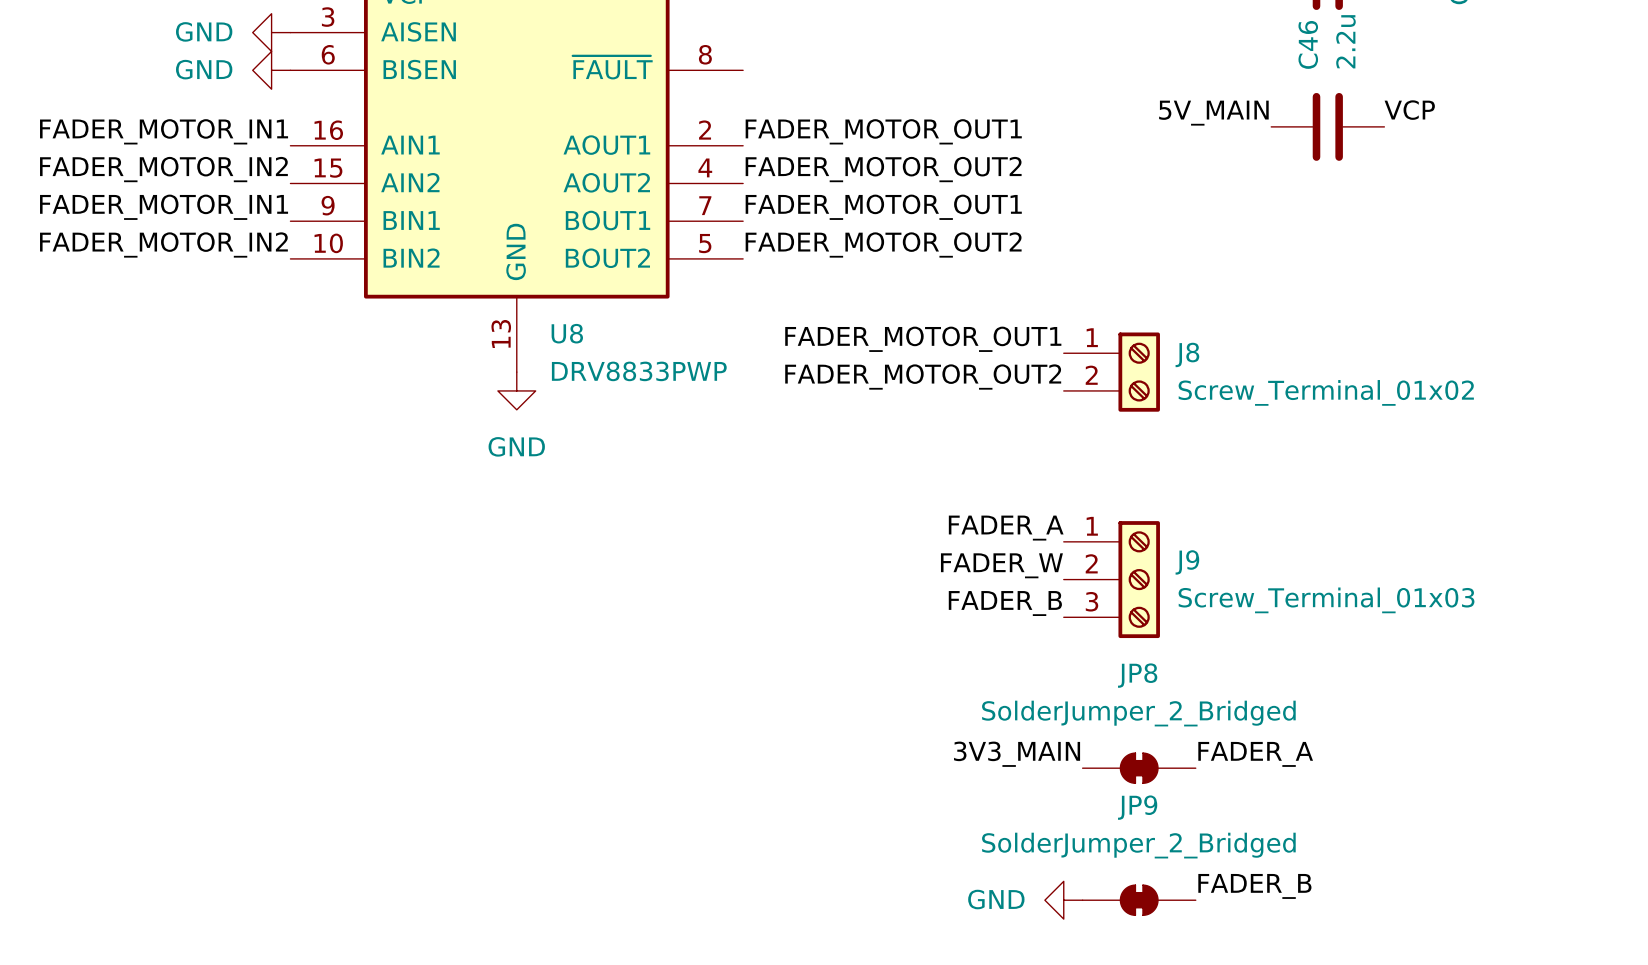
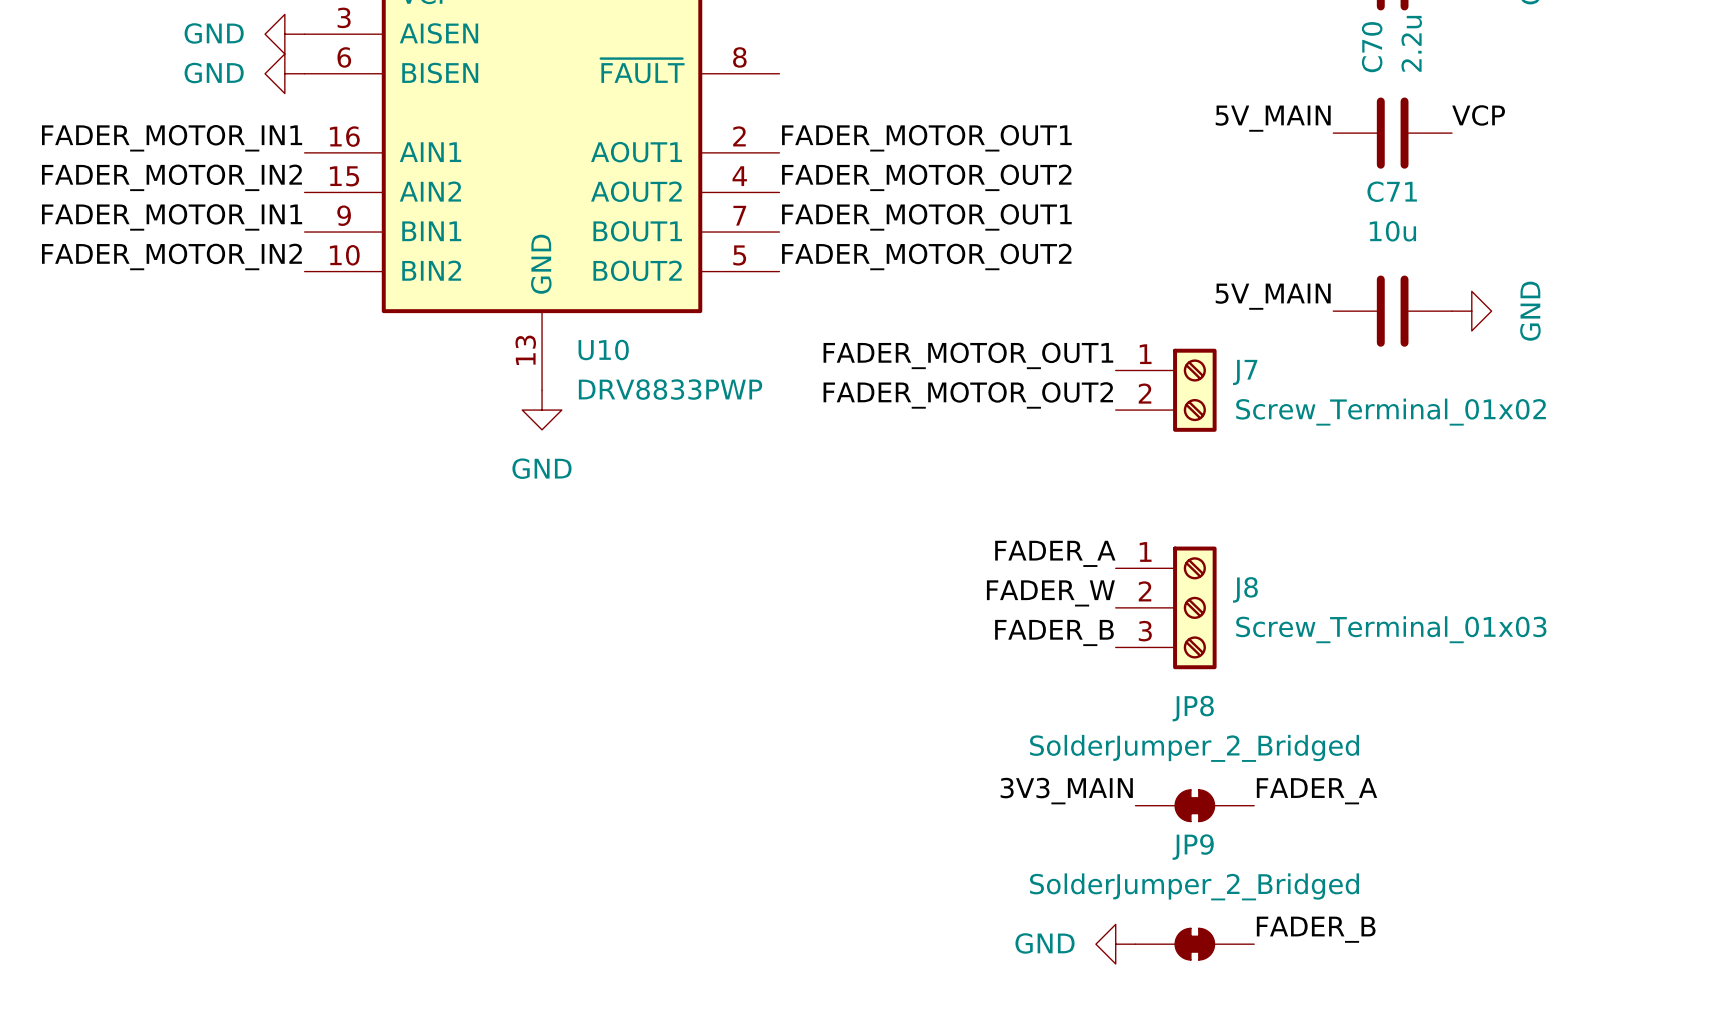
C46 name: C46 (1308, 44) -> C70 (1372, 47)
label: none -> 5V_MAIN (1273, 296)
C71: none -> 10u (1392, 311)
power symbol: none -> GND (1471, 311)
U8 name: U8 (567, 333) -> U10 (603, 349)
J8 name: J8 (1187, 354) -> J7 (1245, 372)
J9 name: J9 (1187, 562) -> J8 (1245, 589)

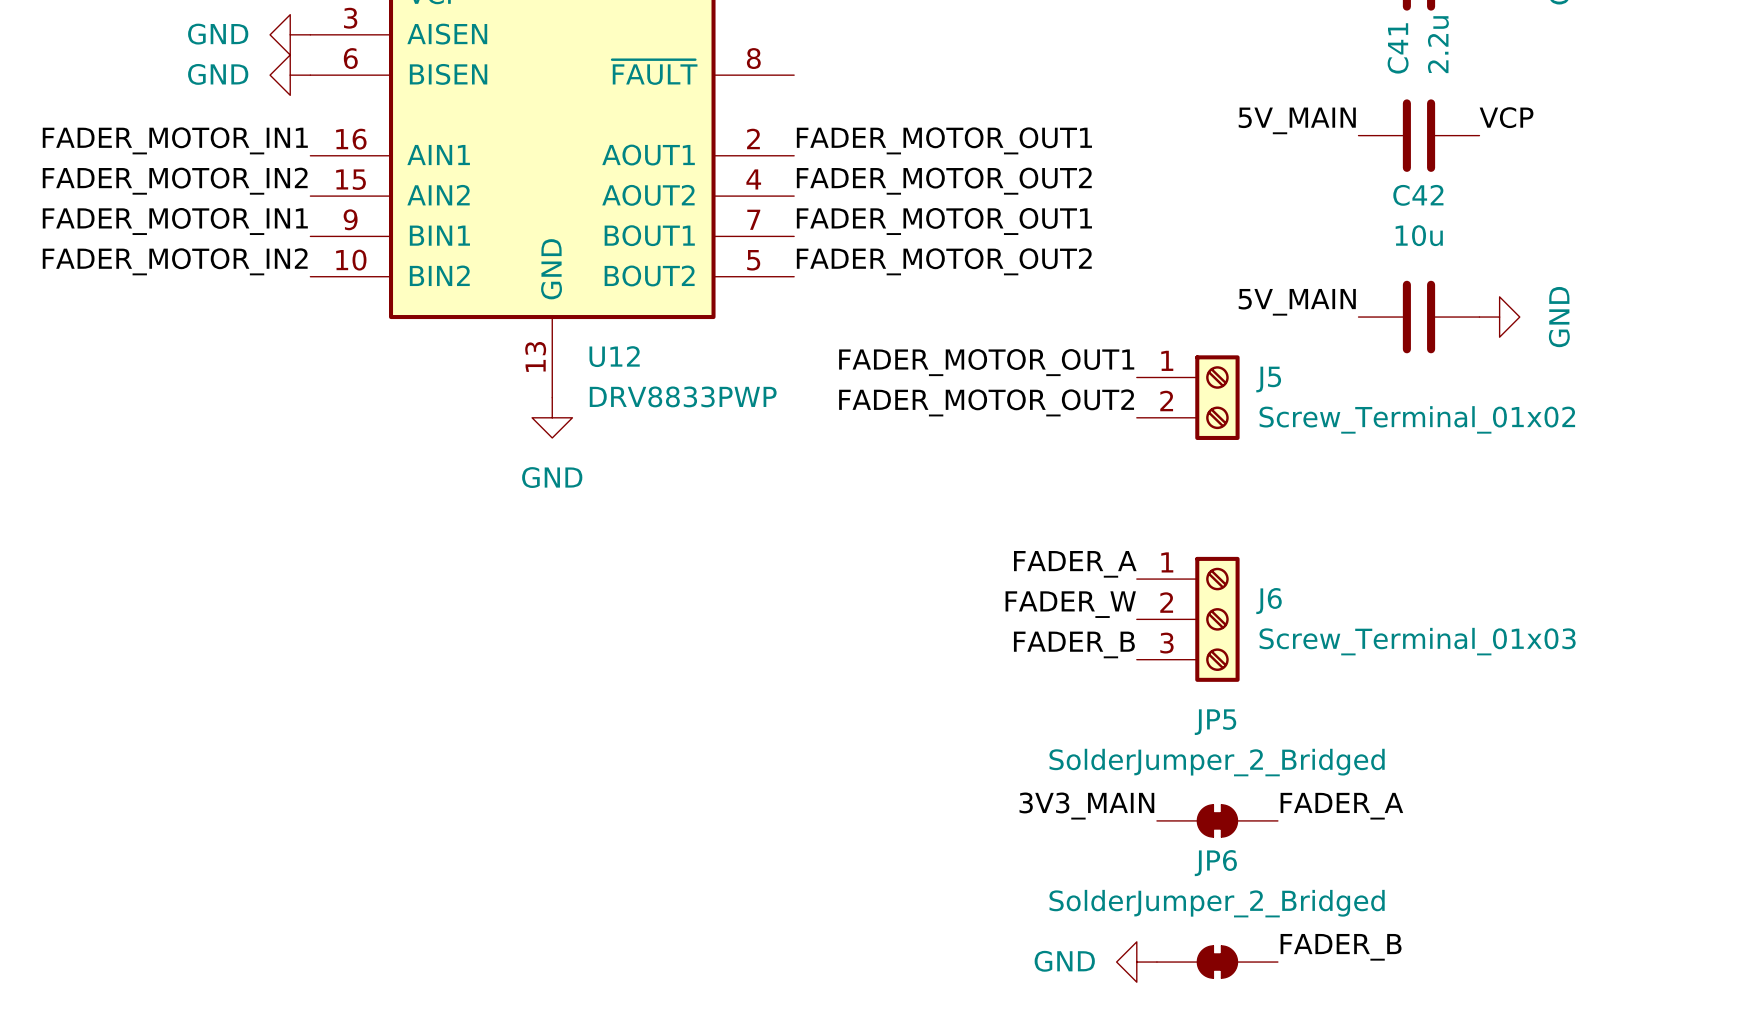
C70 name: C70 (1372, 47) -> C41 (1398, 48)
C71 name: C71 (1392, 191) -> C42 (1418, 195)
U10 name: U10 (603, 349) -> U12 (614, 356)
J7 name: J7 (1245, 372) -> J5 (1268, 379)
J8 name: J8 (1245, 589) -> J6 (1269, 601)
JP8 name: JP8 (1193, 708) -> JP5 (1215, 722)
JP9 name: JP9 (1193, 847) -> JP6 (1215, 863)

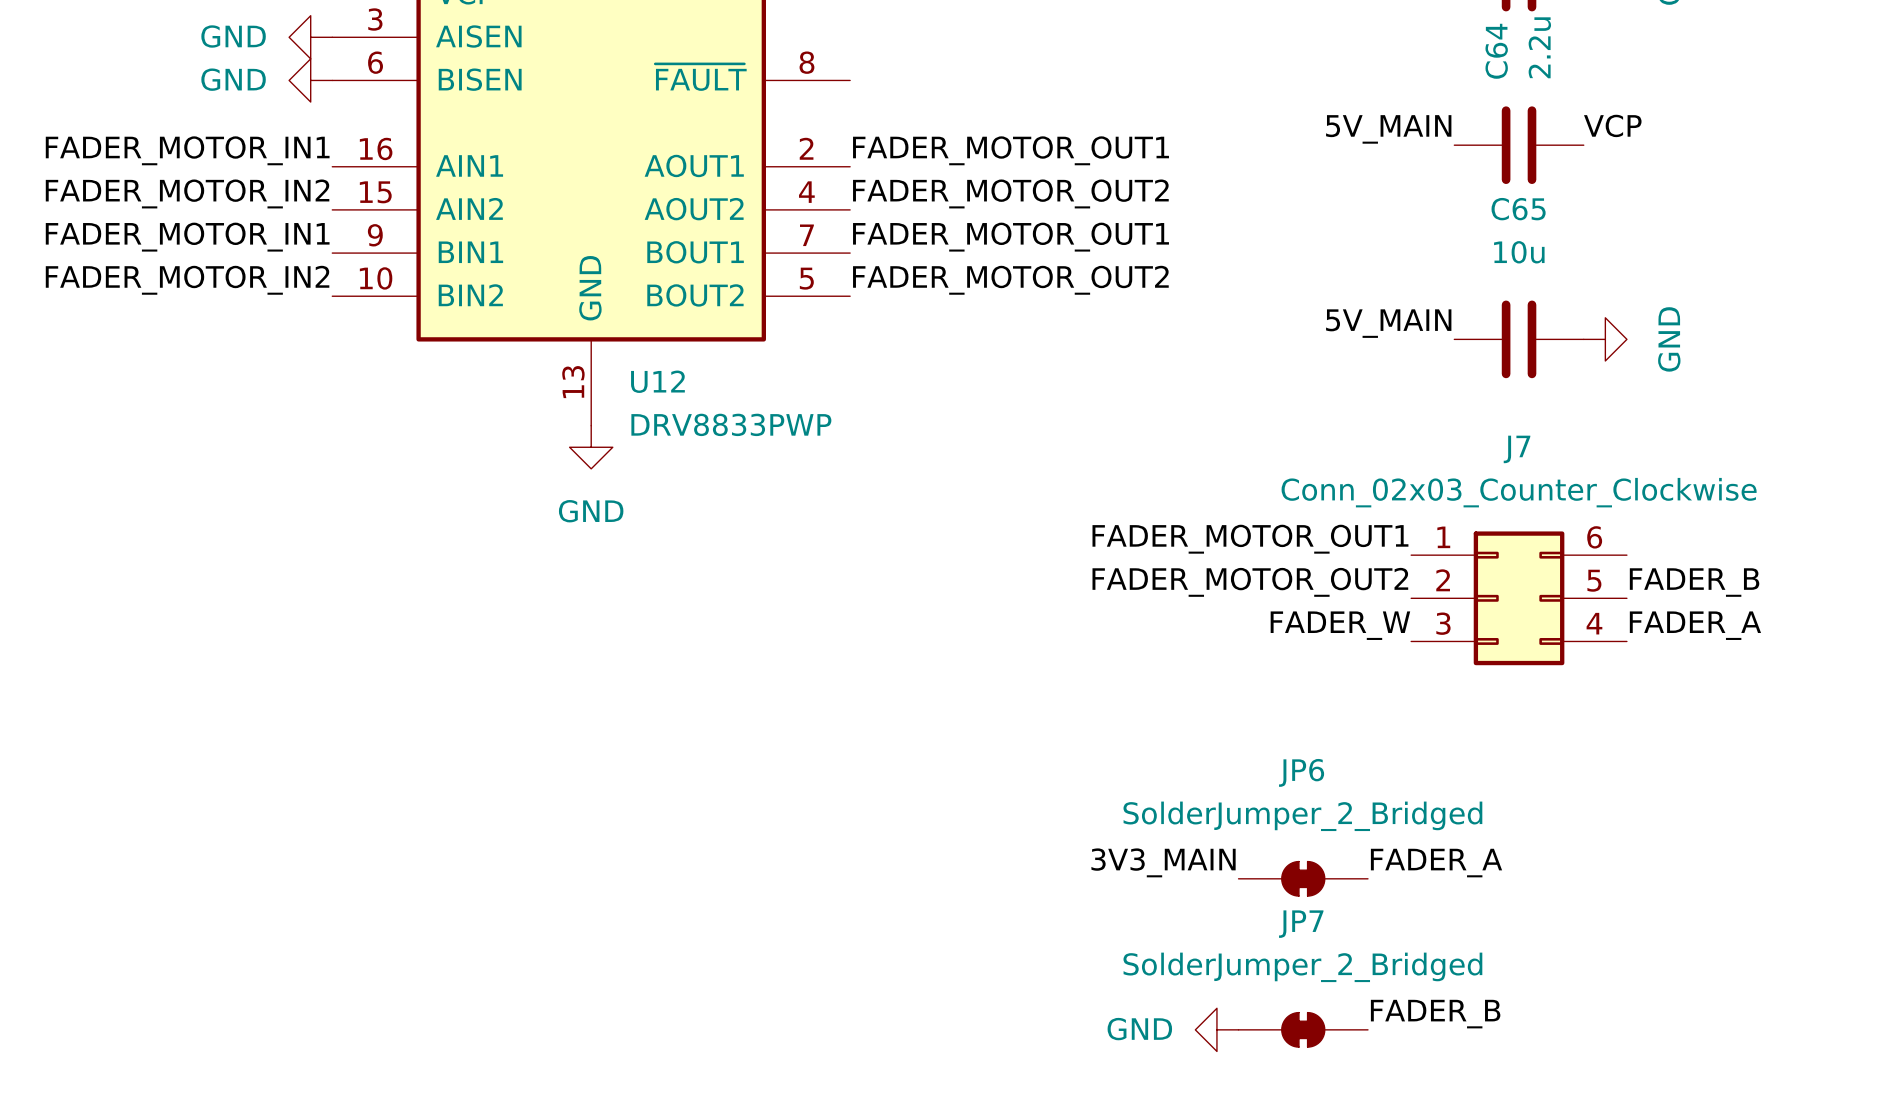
C41 name: C41 (1398, 48) -> C64 (1496, 51)
C42 name: C42 (1418, 195) -> C65 (1518, 209)
label position: FADER_MOTOR_OUT1 (986, 362) -> FADER_MOTOR_OUT1 (1250, 539)
J5: Screw_Terminal_01x02 (1188, 397) -> none
label position: FADER_MOTOR_OUT2 (986, 402) -> FADER_MOTOR_OUT2 (1250, 582)
J7: none -> Conn_02x03_Counter_Clockwise (1519, 598)
label position: FADER_A (1075, 564) -> FADER_A (1695, 625)
label position: FADER_W (1070, 604) -> FADER_W (1340, 625)
J6: Screw_Terminal_01x03 (1188, 619) -> none
label position: FADER_B (1074, 644) -> FADER_B (1694, 582)
JP5 name: JP5 (1215, 722) -> JP6 (1301, 772)
JP6 name: JP6 (1215, 863) -> JP7 (1301, 924)

